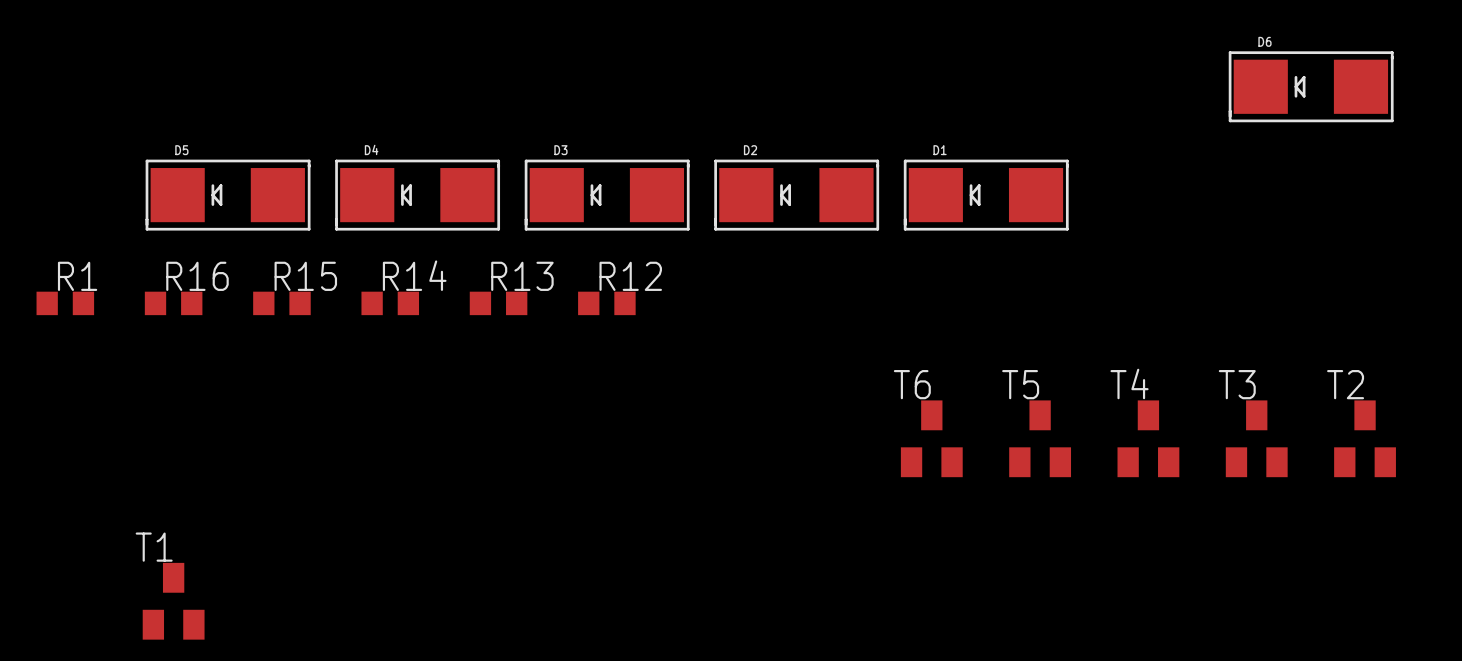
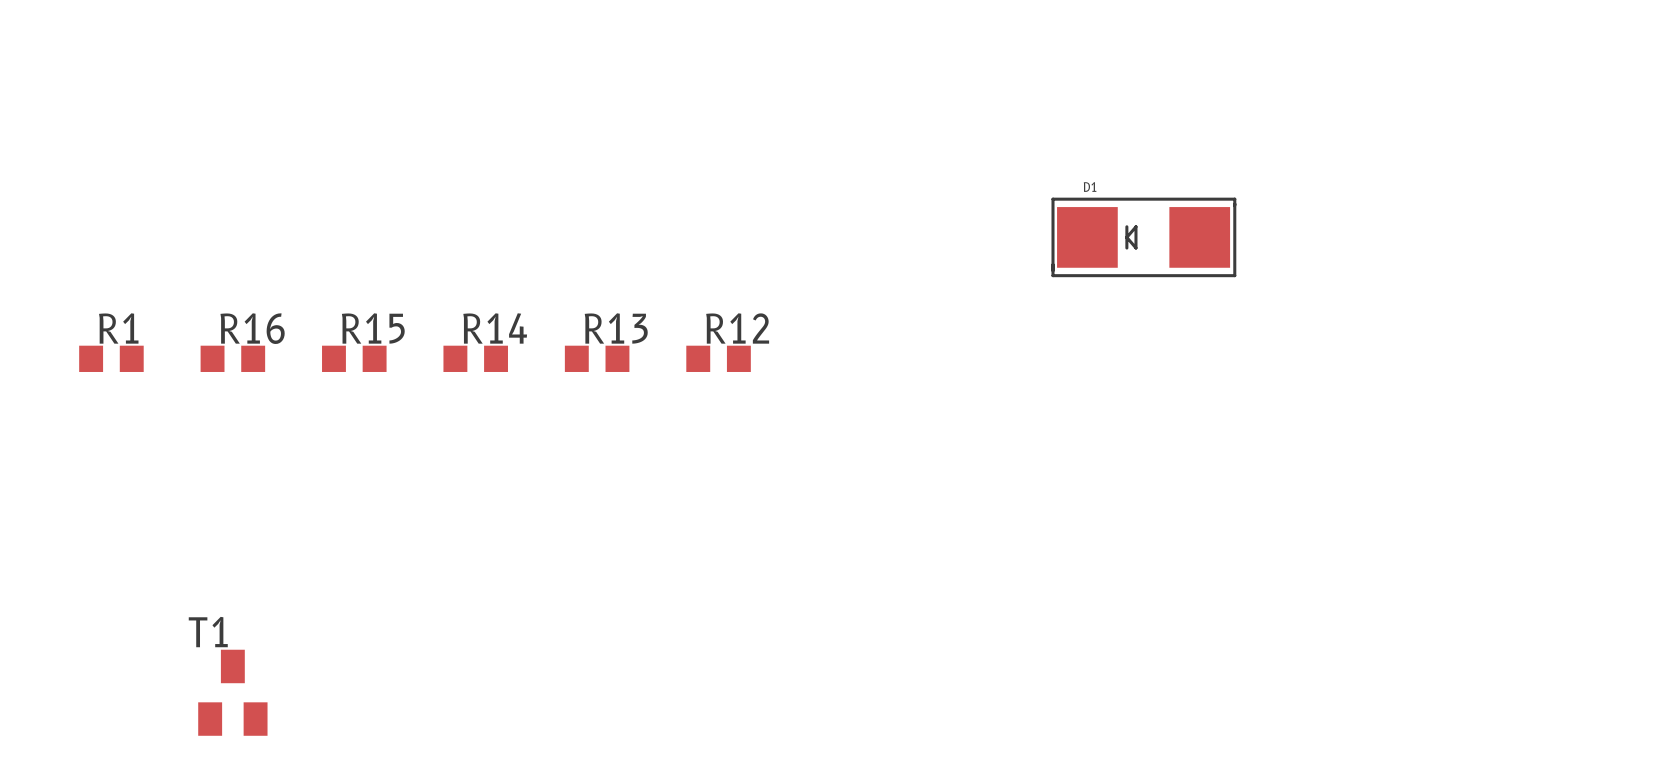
D6: (1311, 86) -> none
D5: (228, 195) -> none
D4: (417, 195) -> none
D3: (607, 195) -> none
D2: (796, 195) -> none
T6: (931, 438) -> none
T5: (1040, 438) -> none
T4: (1148, 438) -> none
T3: (1256, 438) -> none
T2: (1365, 438) -> none

